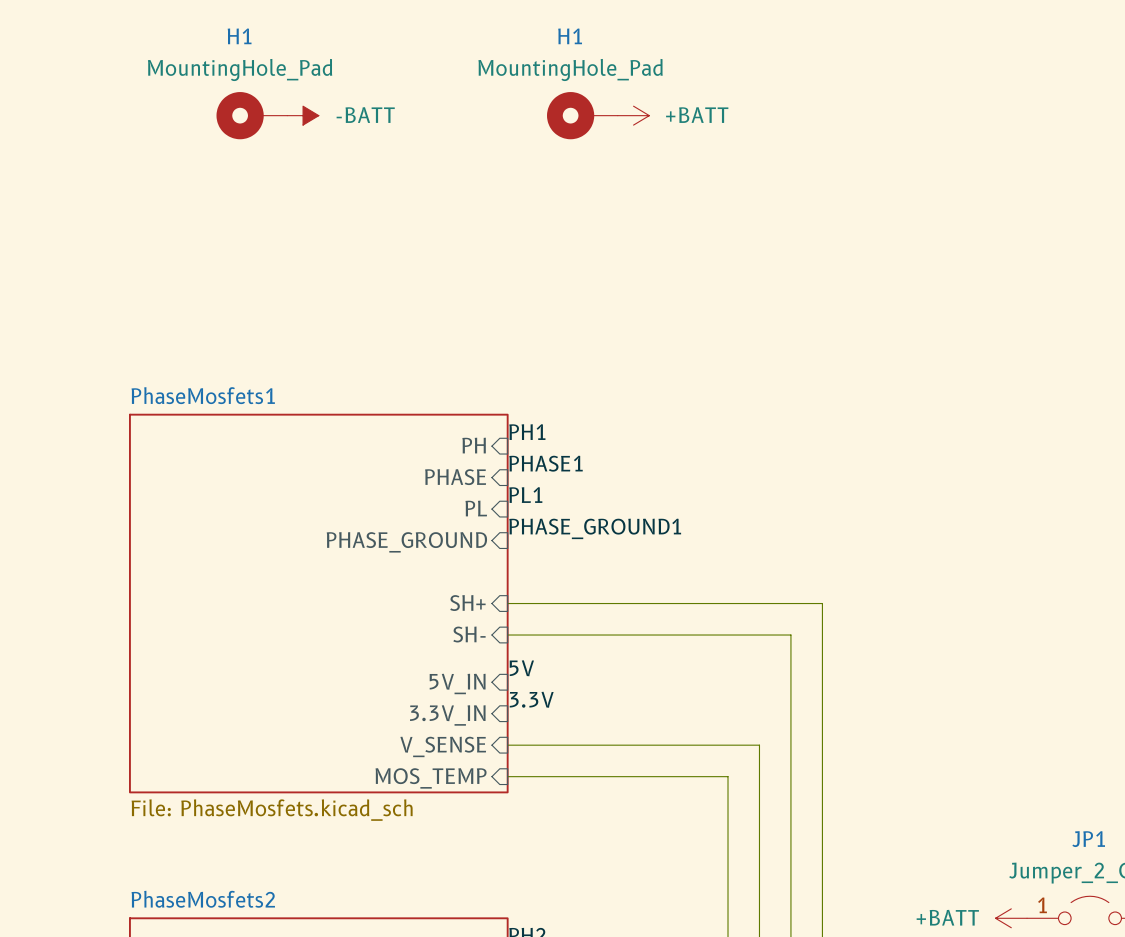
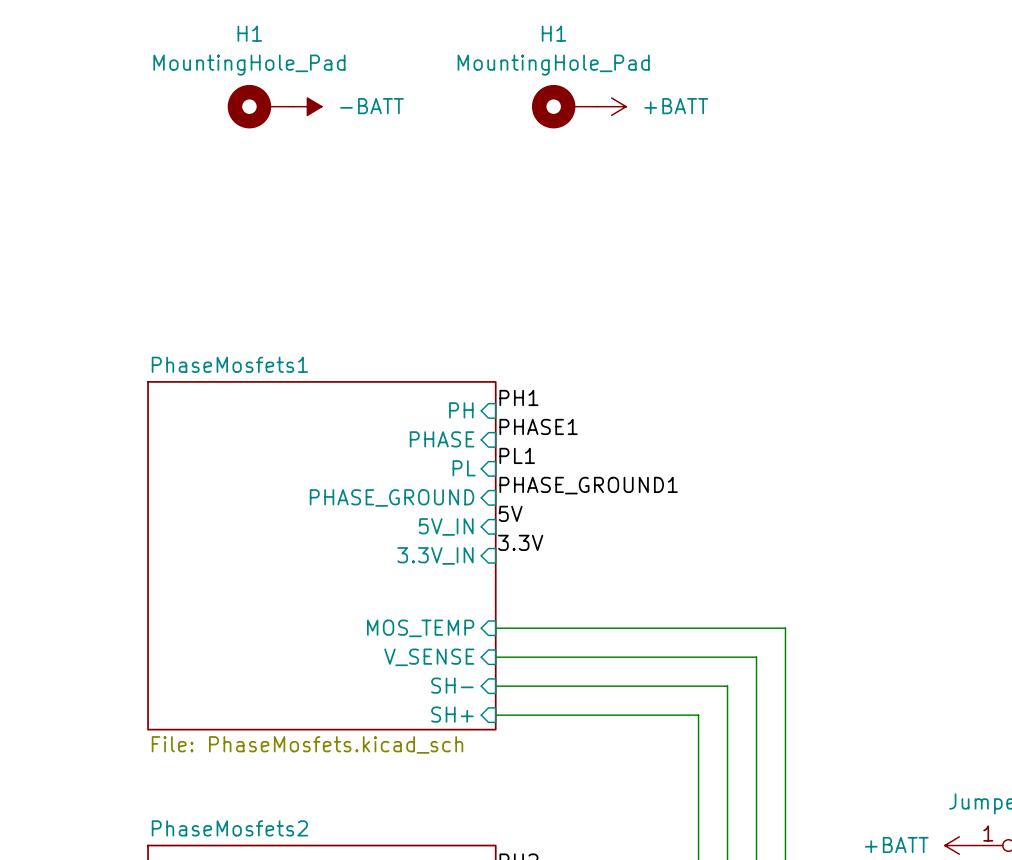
sheet pin: none -> 5V_IN (446, 526)
sheet pin: SH+ (467, 603) -> 3.3V_IN (435, 555)
wire: (507, 603) (822, 603) (822, 682) -> (495, 628) (785, 628)
sheet pin: SH- (469, 634) -> none
wire: (507, 635) (790, 635) (790, 713) -> (495, 657) (756, 657)
label position: 5V (521, 668) -> 5V (510, 513)
sheet pin: 5V_IN (457, 683) -> MOS_TEMP (420, 628)
label position: 3.3V (531, 699) -> 3.3V (520, 542)
sheet pin: 3.3V_IN (447, 715) -> V_SENSE (429, 657)
sheet pin: V_SENSE (443, 746) -> SH- (452, 685)
sheet pin: MOS_TEMP (431, 778) -> SH+ (452, 714)

